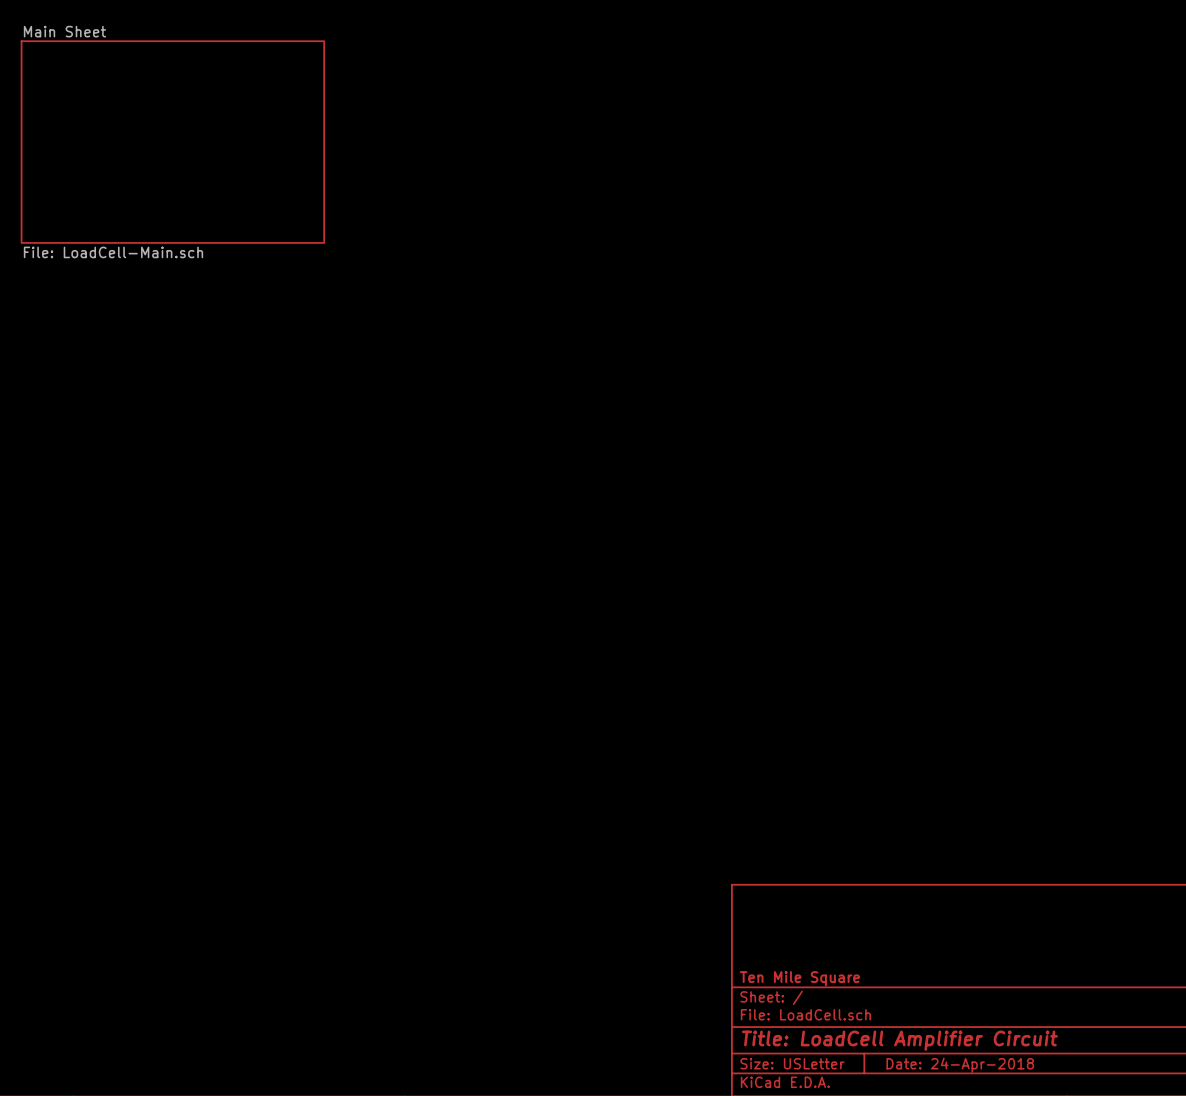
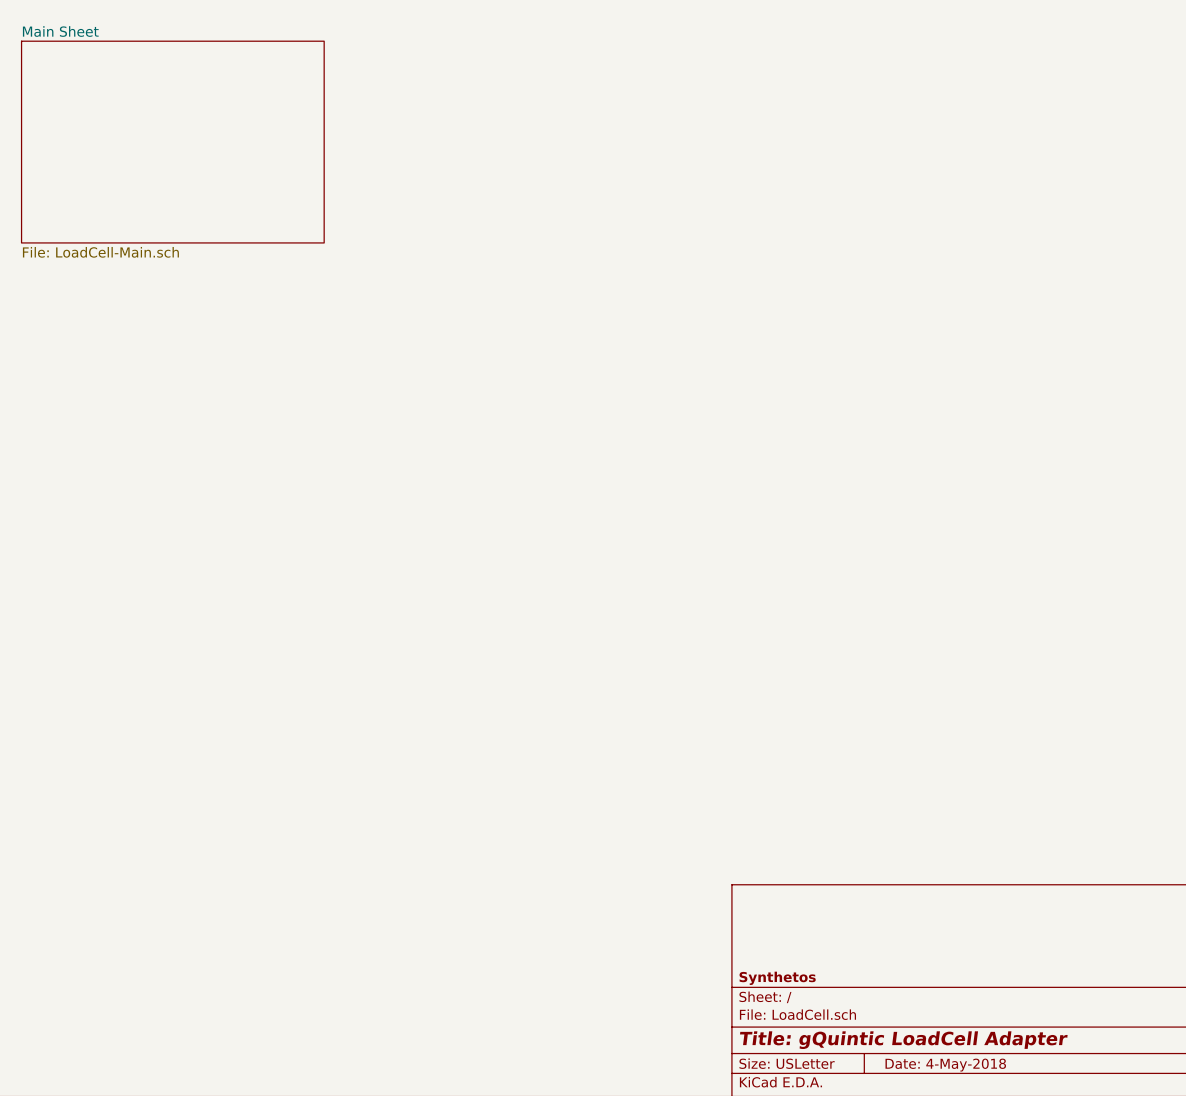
title block: Ten Mile Square (799, 978) -> Synthetos (777, 978)
title block: Title: LoadCell Amplifier Circuit (899, 1040) -> Title: gQuintic LoadCell Adapter (903, 1040)
title block: Date: 24-Apr-2018 (960, 1065) -> Date: 4-May-2018 (945, 1065)

